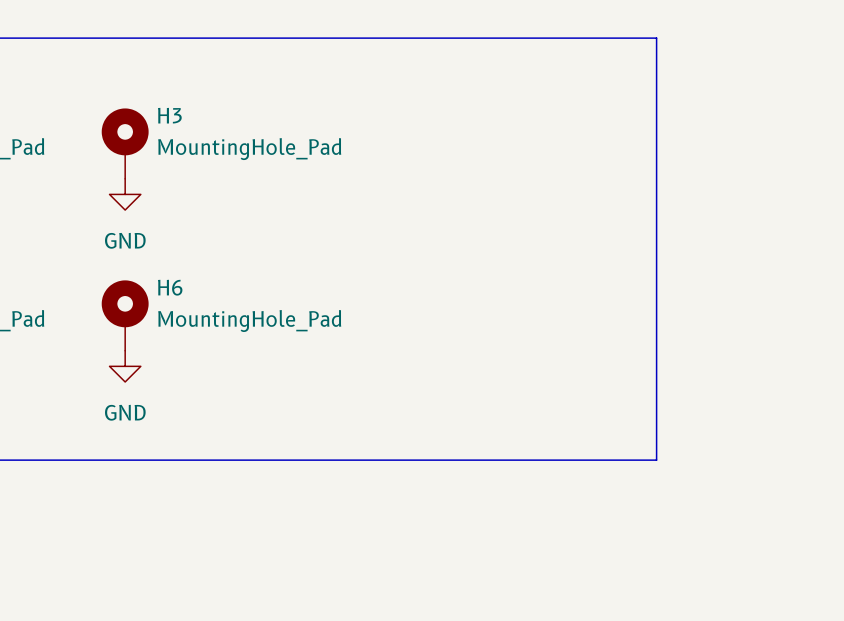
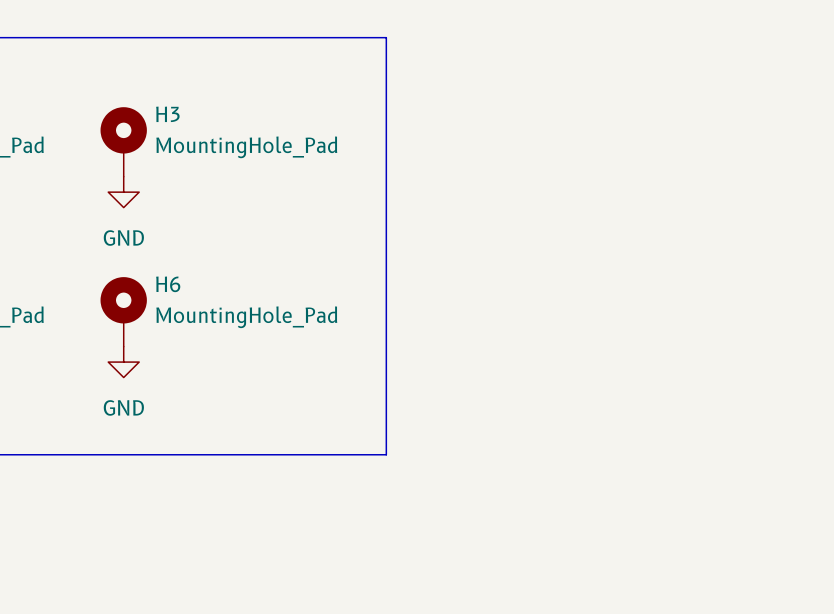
line: (390, 38) (656, 38) (656, 460) (390, 460) -> (386, 37) (386, 454)

